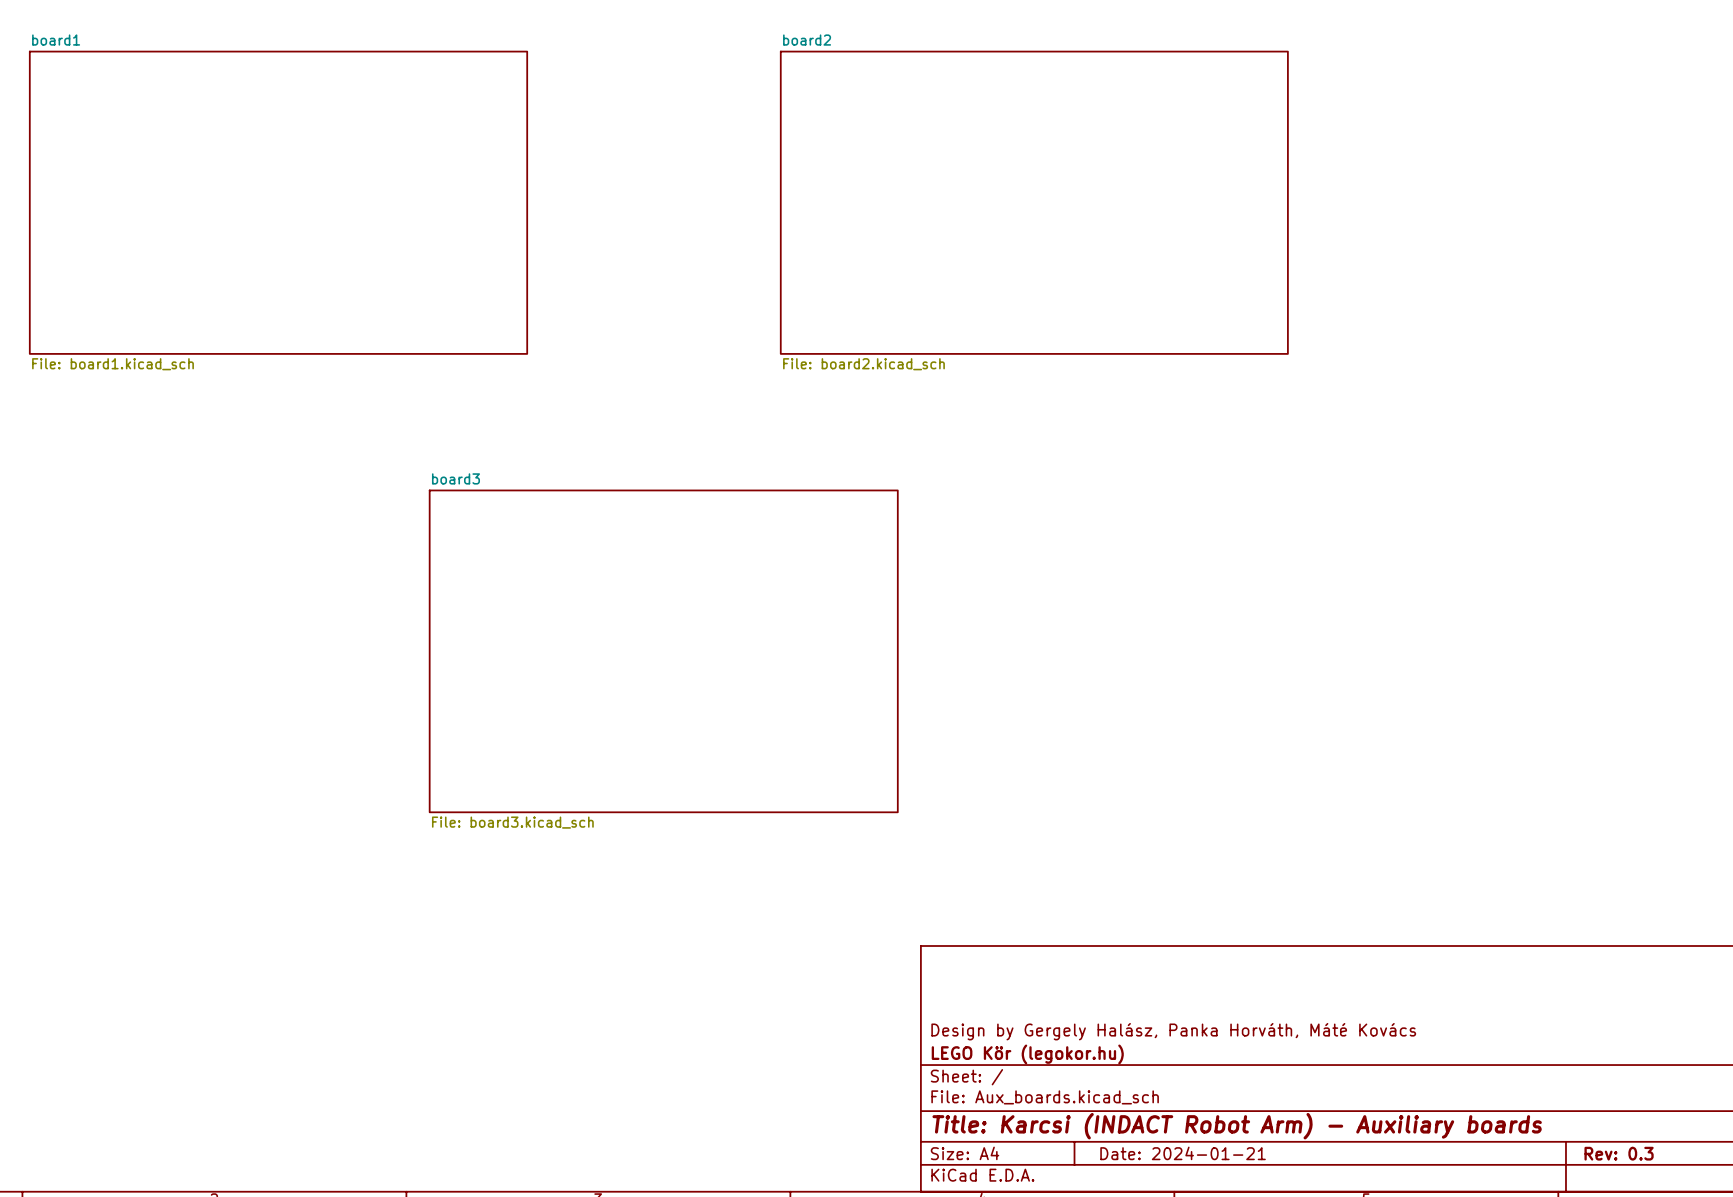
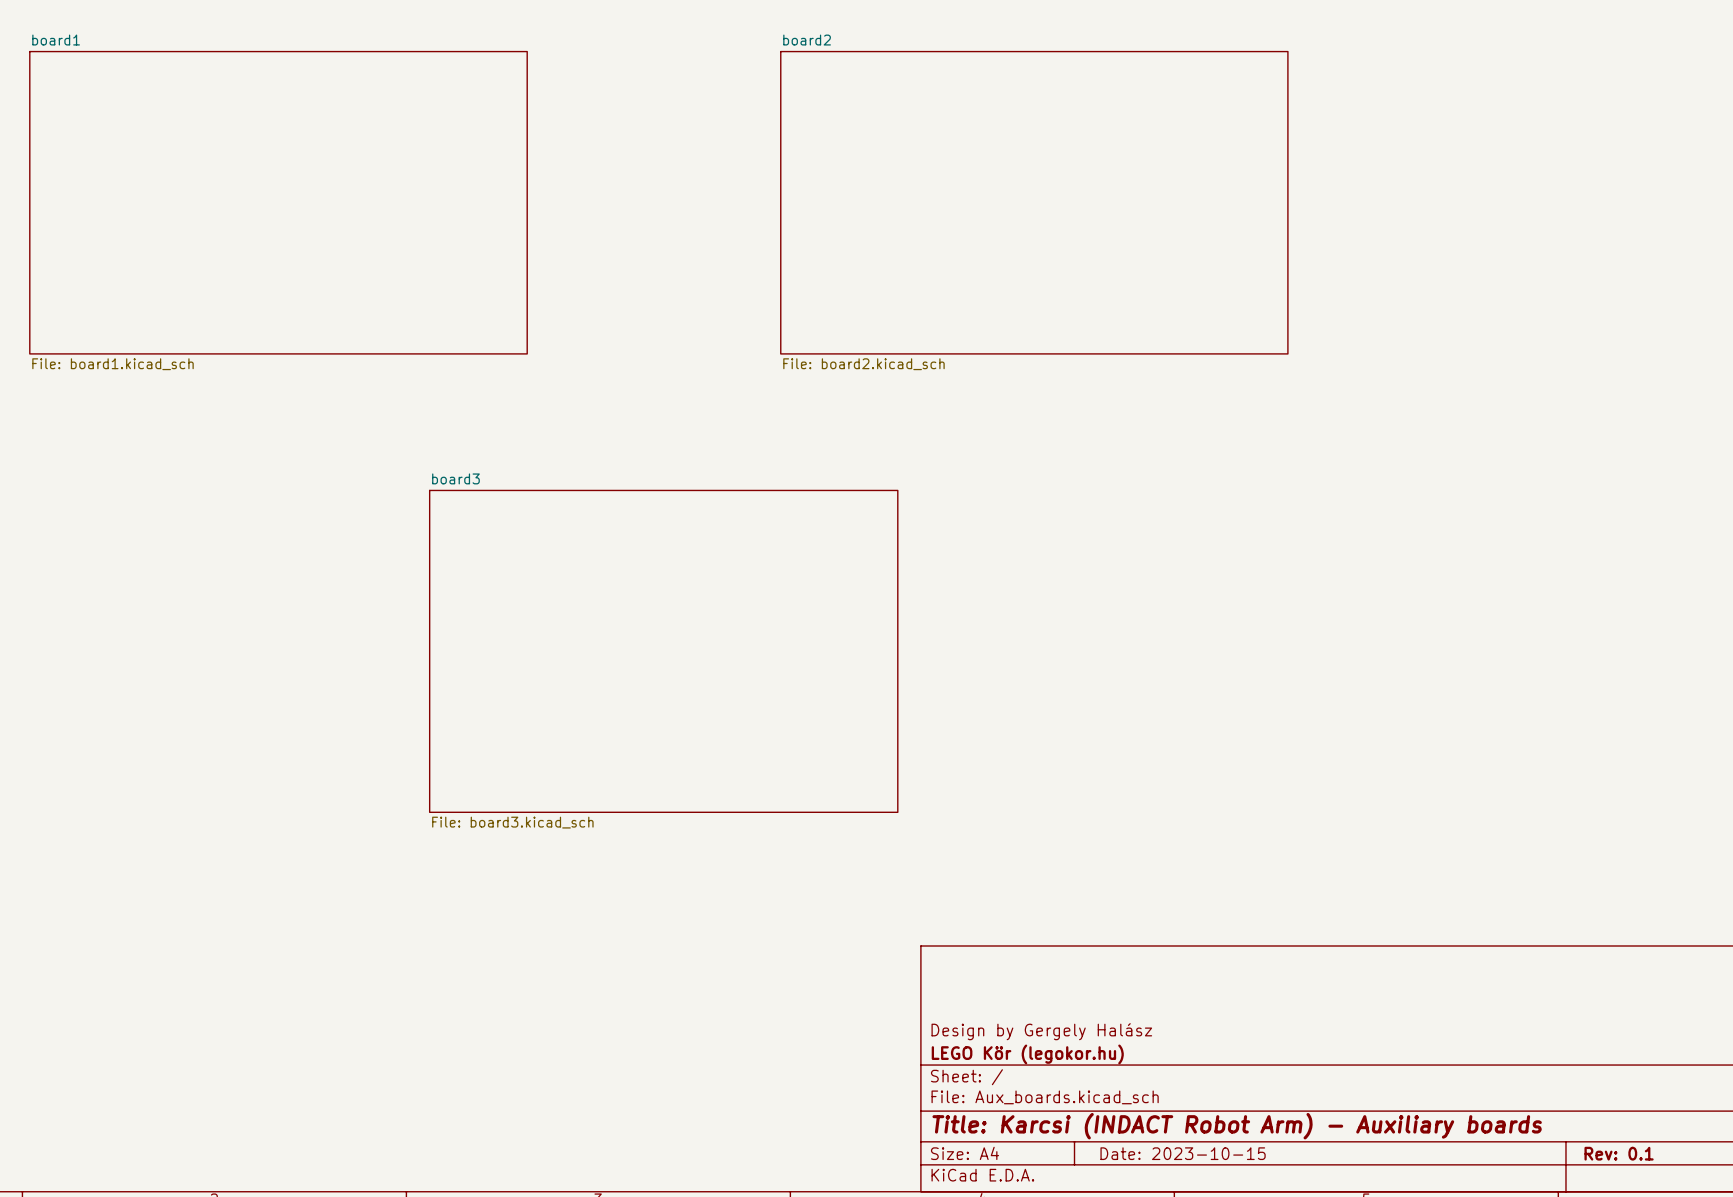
title block: Design by Gergely Halász, Panka Horváth, Máté Kovács (1173, 1031) -> Design by Gergely Halász (1041, 1031)
title block: Date: 2024-01-21 (1183, 1153) -> Date: 2023-10-15 (1183, 1153)
title block: Rev: 0.3 (1619, 1153) -> Rev: 0.1 (1619, 1153)

